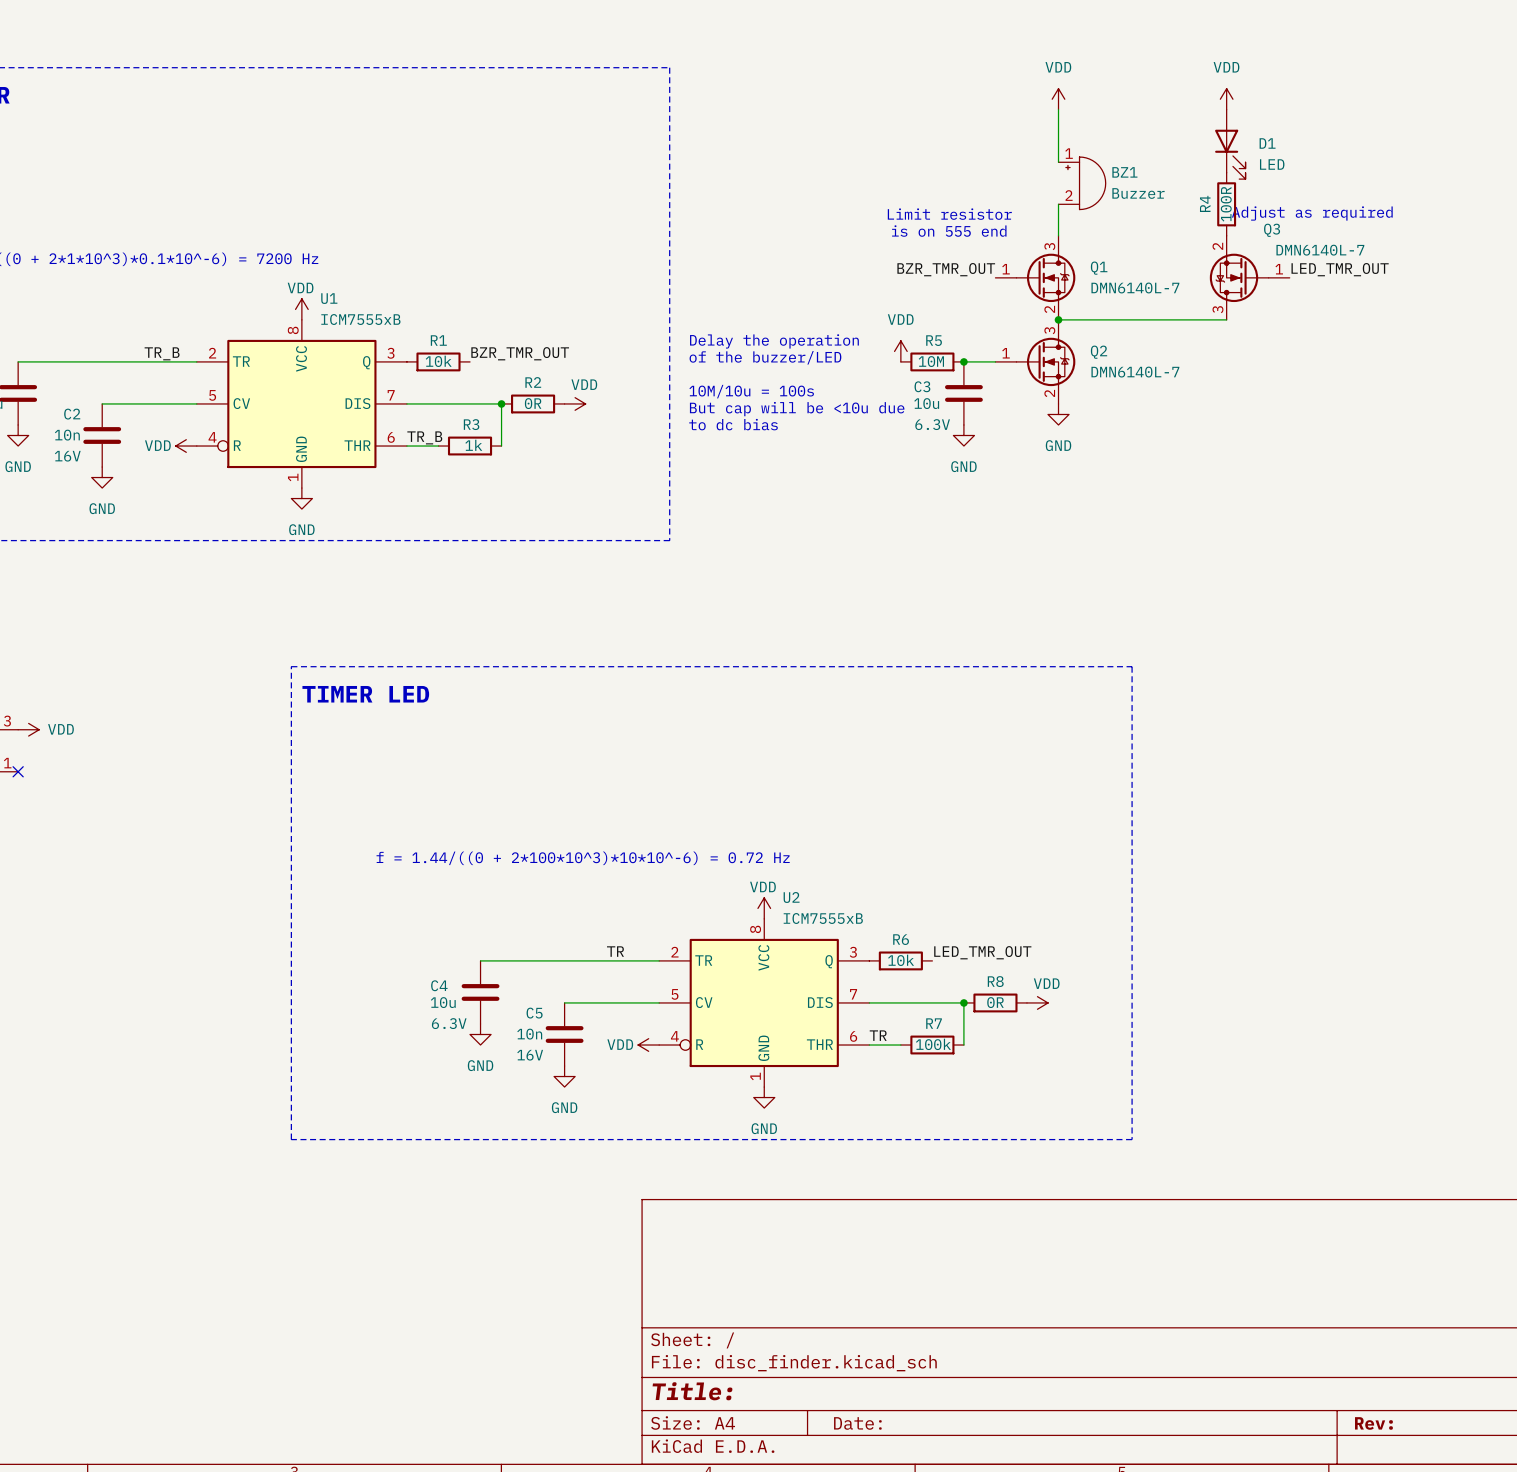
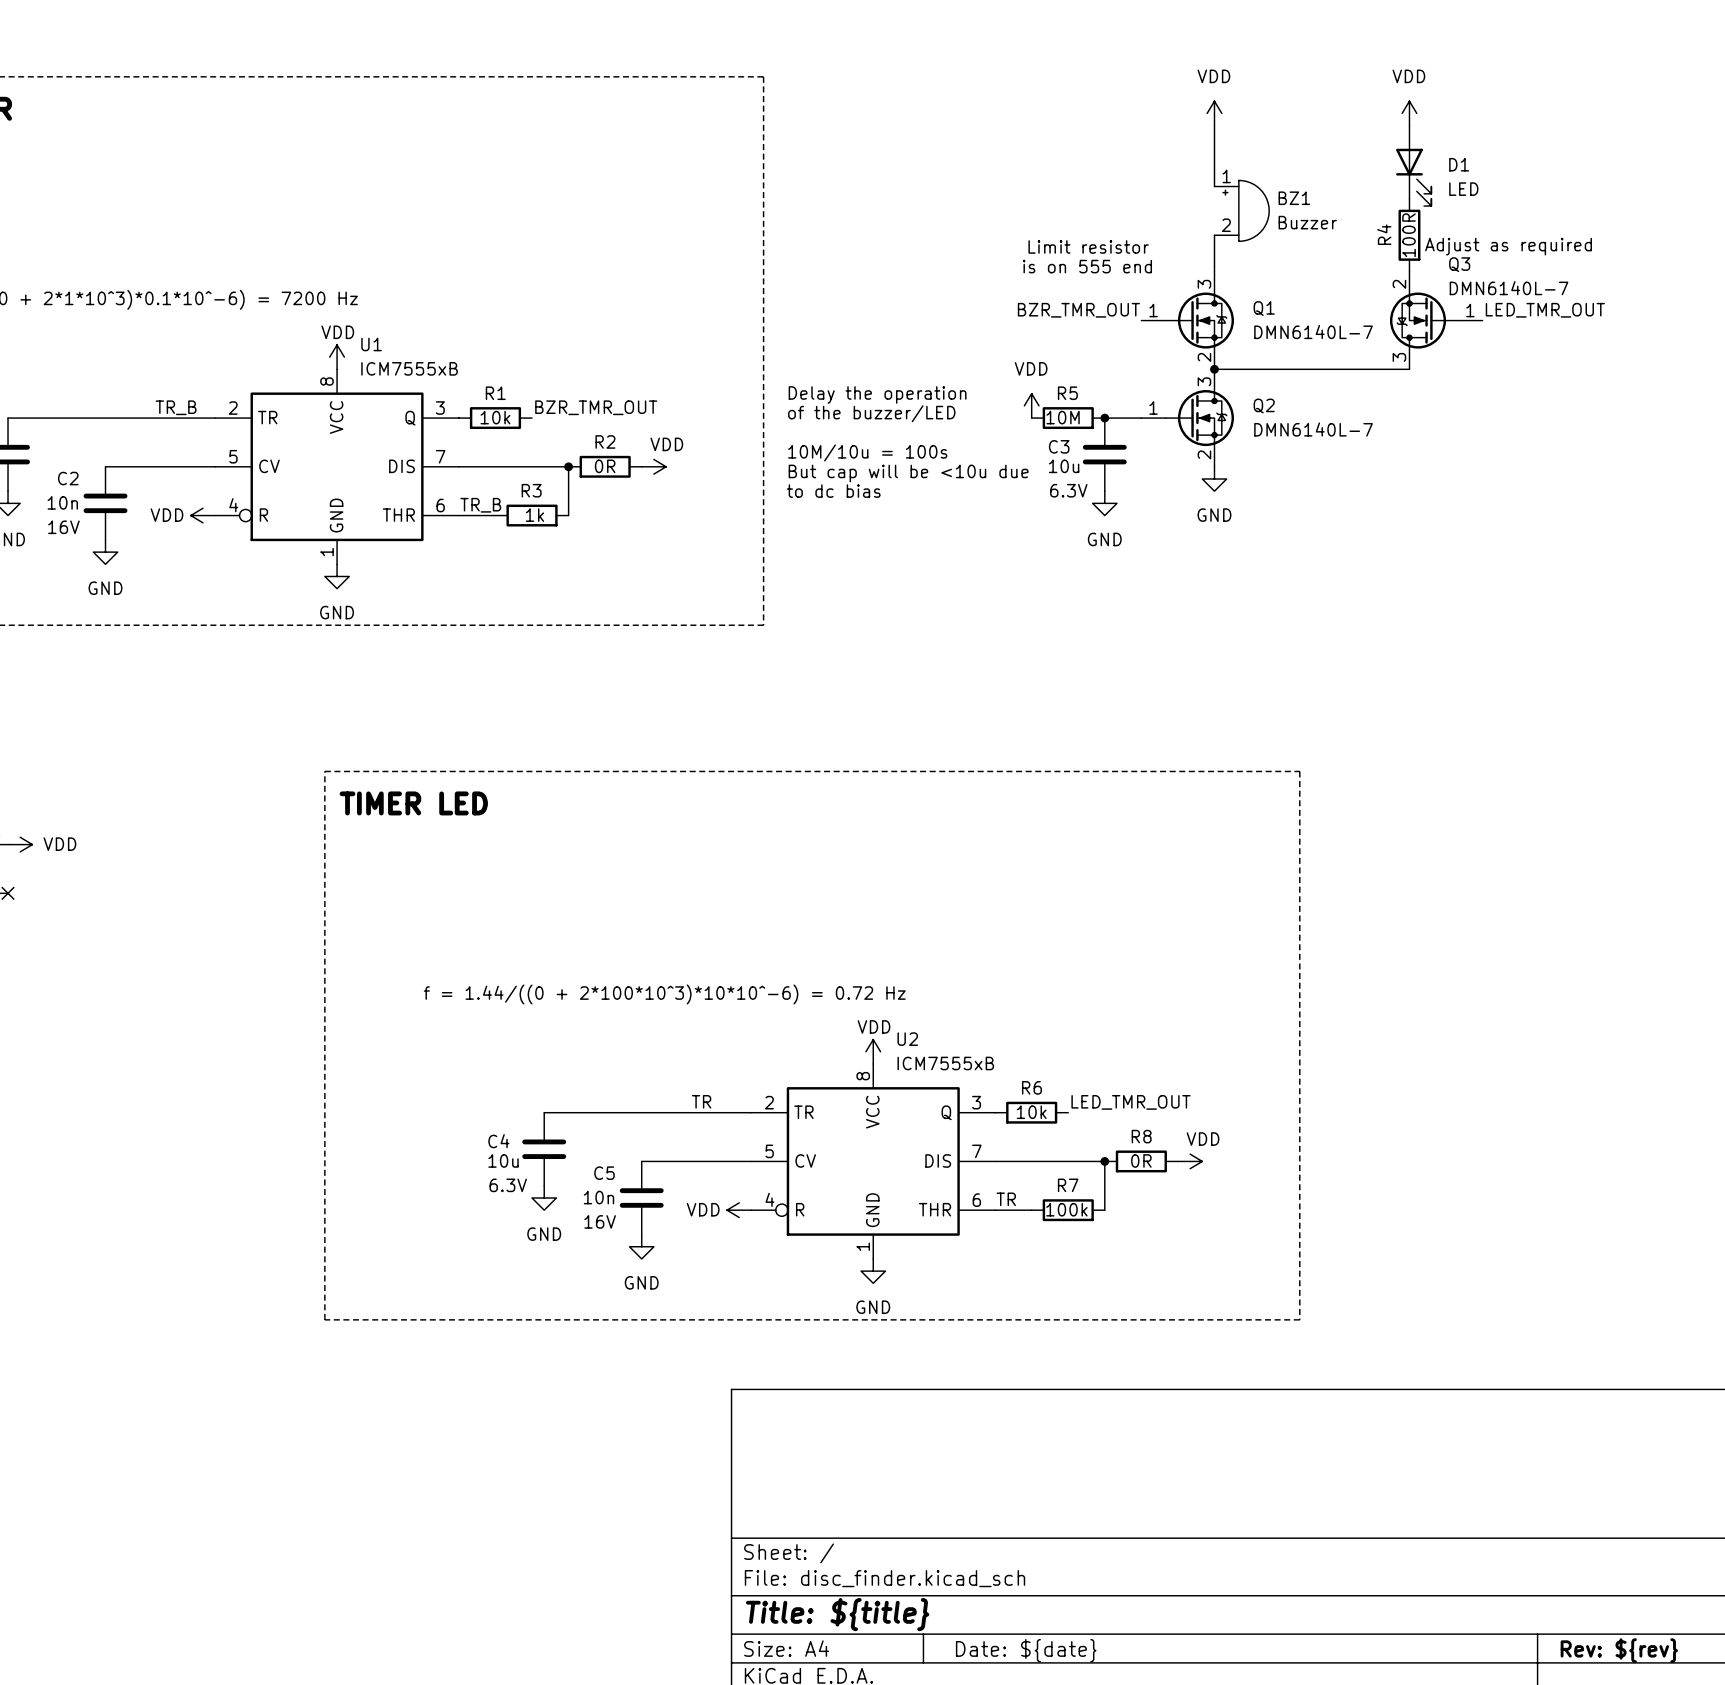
title block: Title: (692, 1391) -> Title: ${title} (837, 1614)
title block: Date: (857, 1423) -> Date: ${date} (1026, 1650)
title block: Rev: (1373, 1423) -> Rev: ${rev} (1619, 1650)

